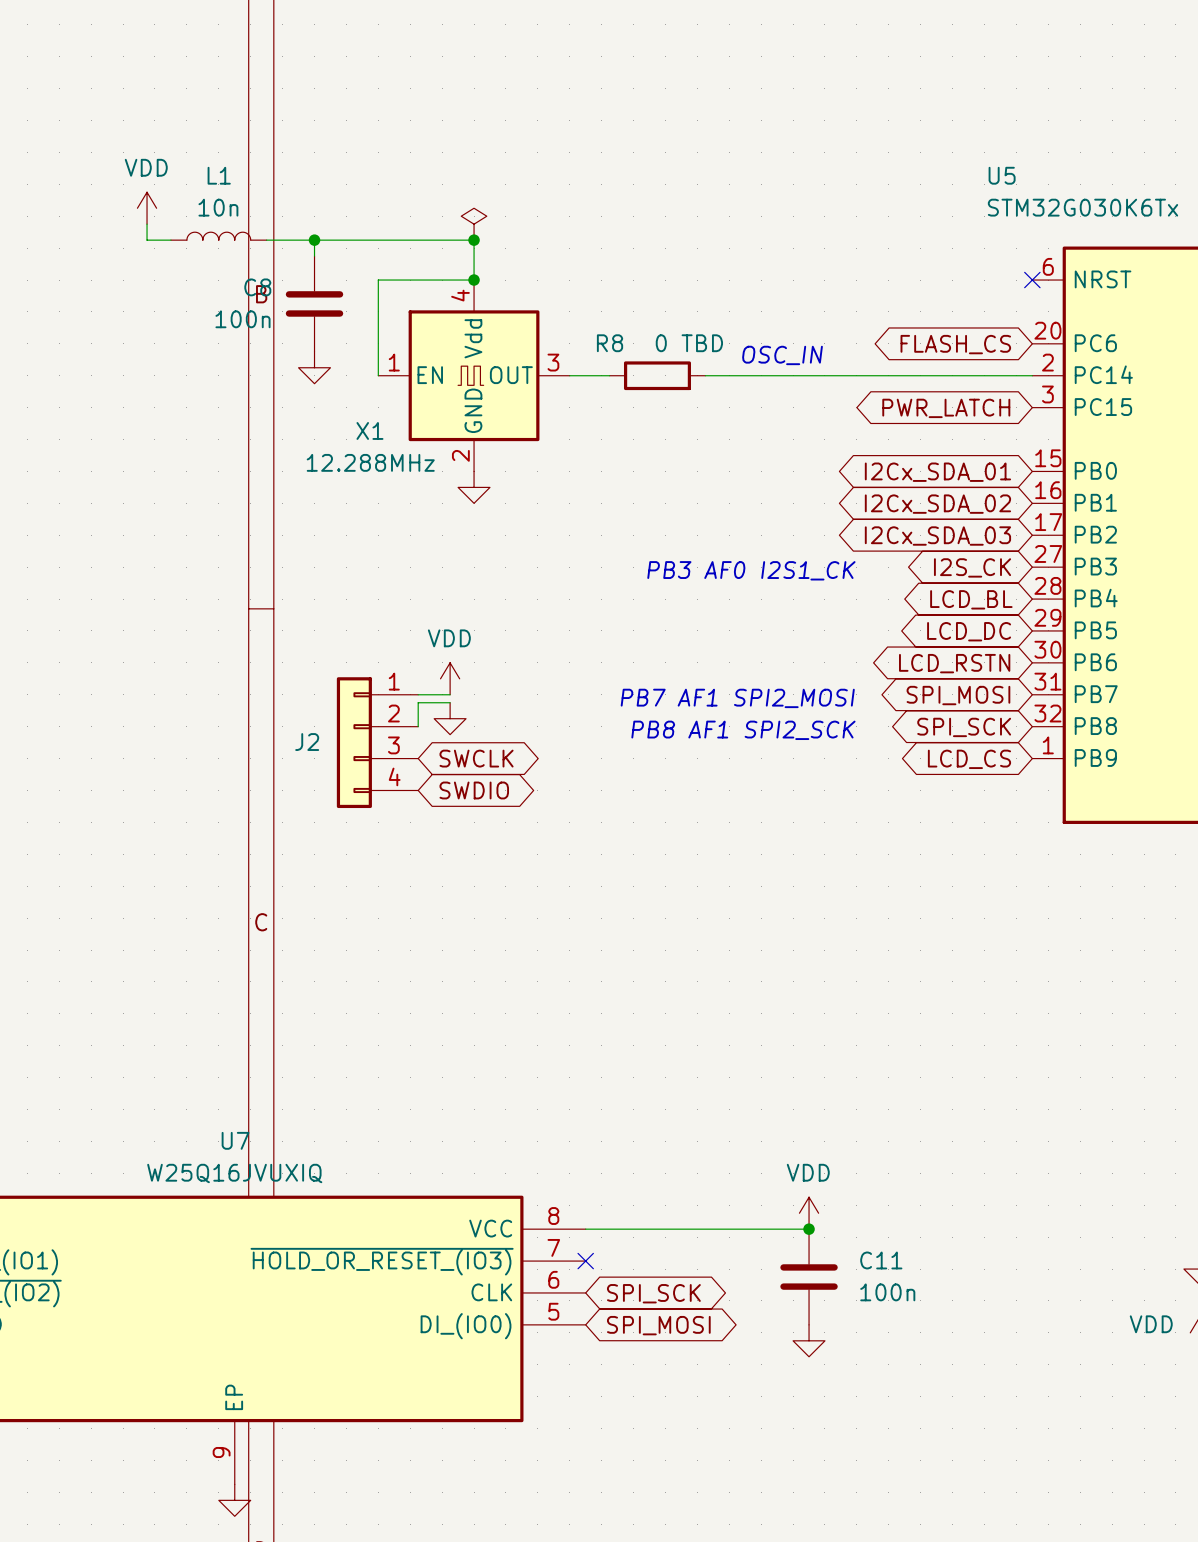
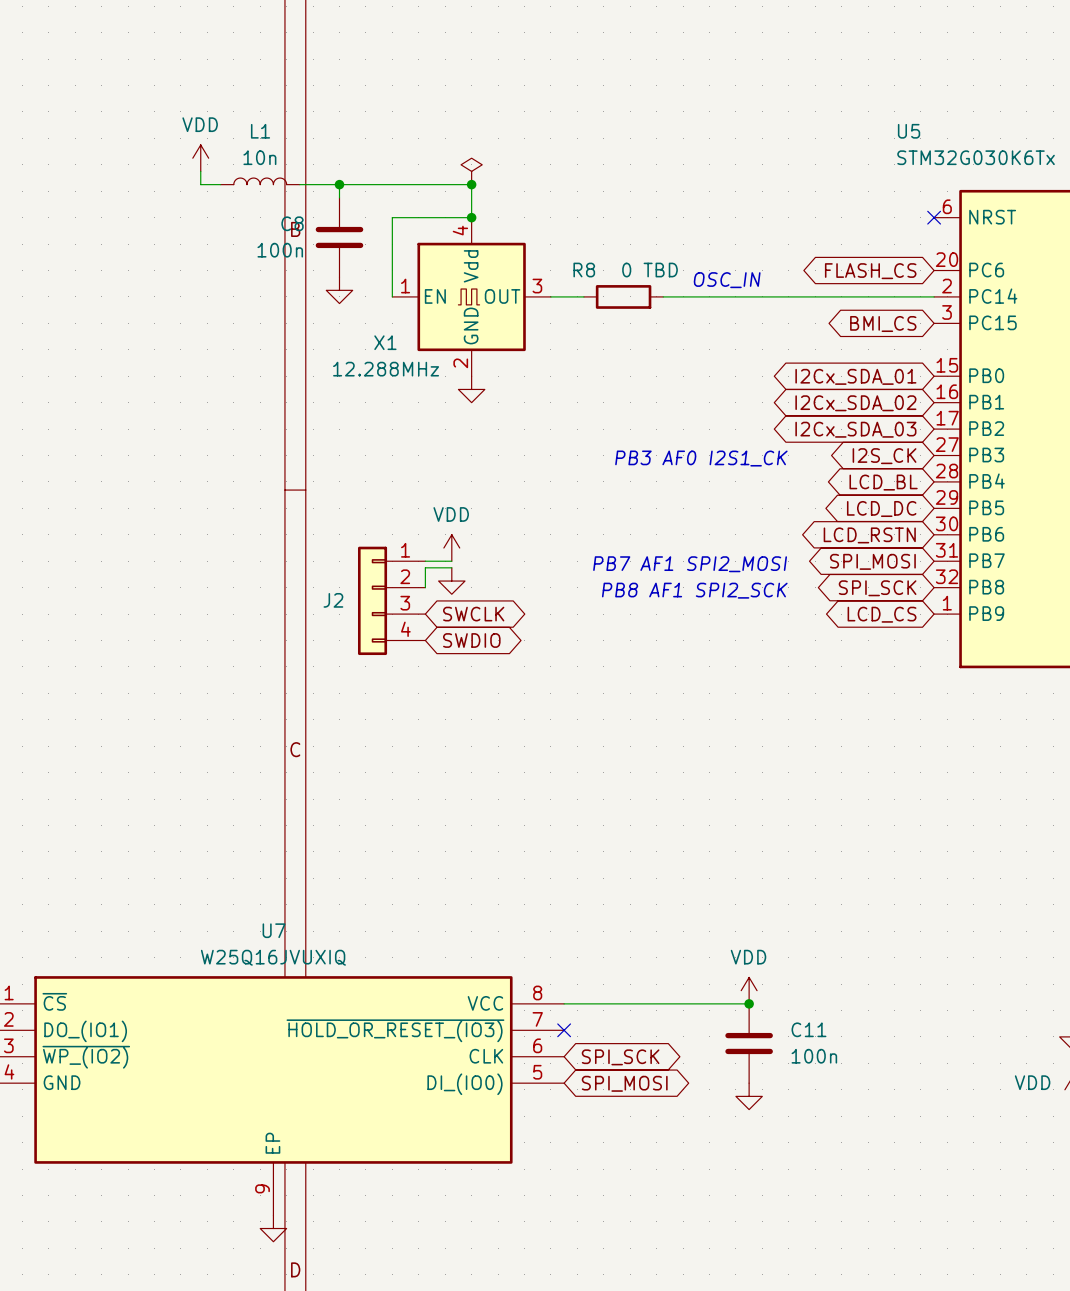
global label: PWR_LATCH (946, 408) -> BMI_CS (883, 324)

